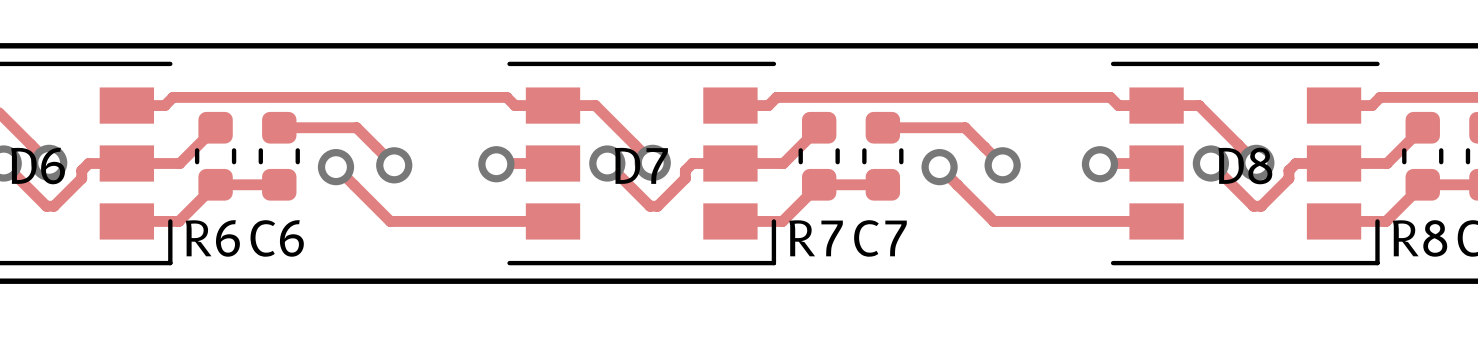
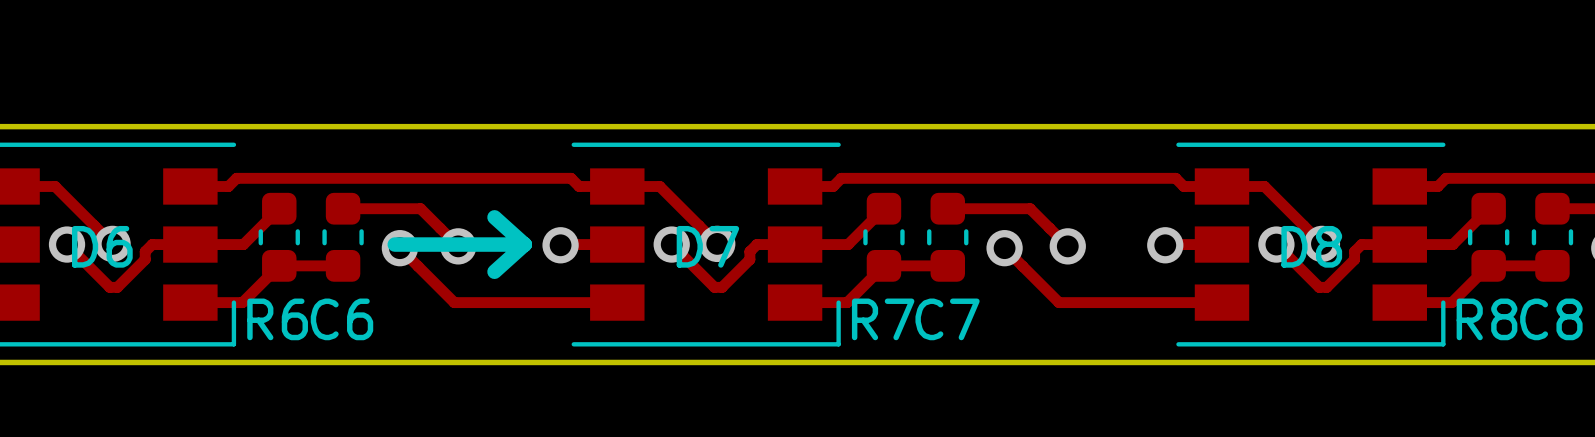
line: none -> (494, 217) (524, 244)
line: none -> (394, 244) (524, 244)
line: none -> (524, 244) (494, 271)

